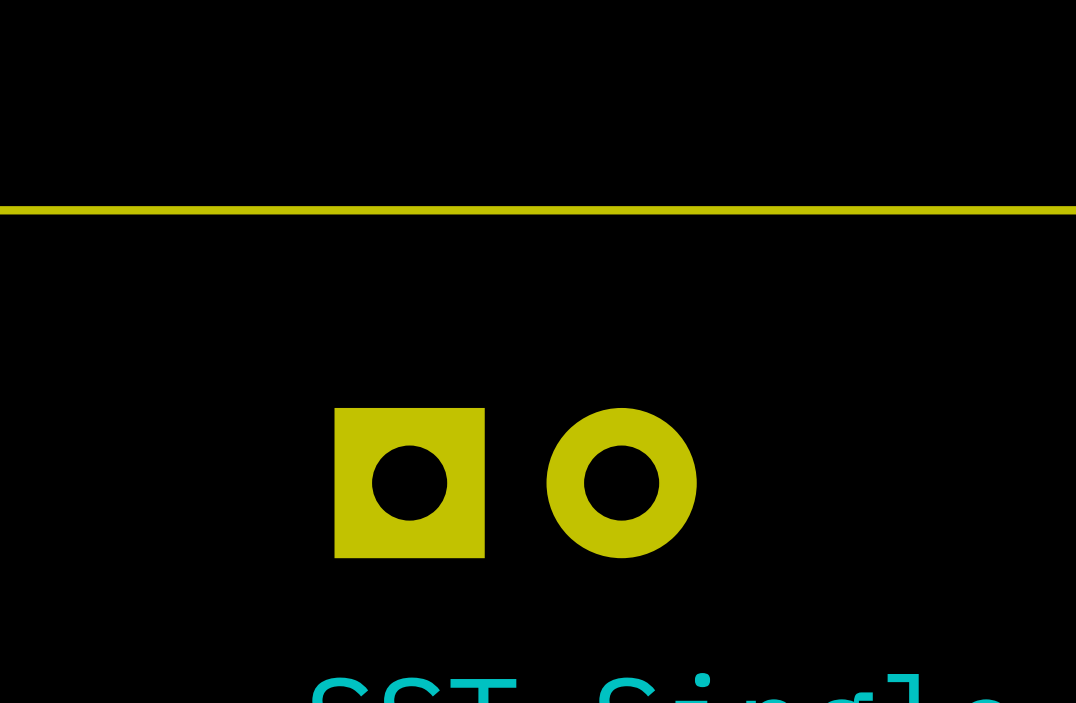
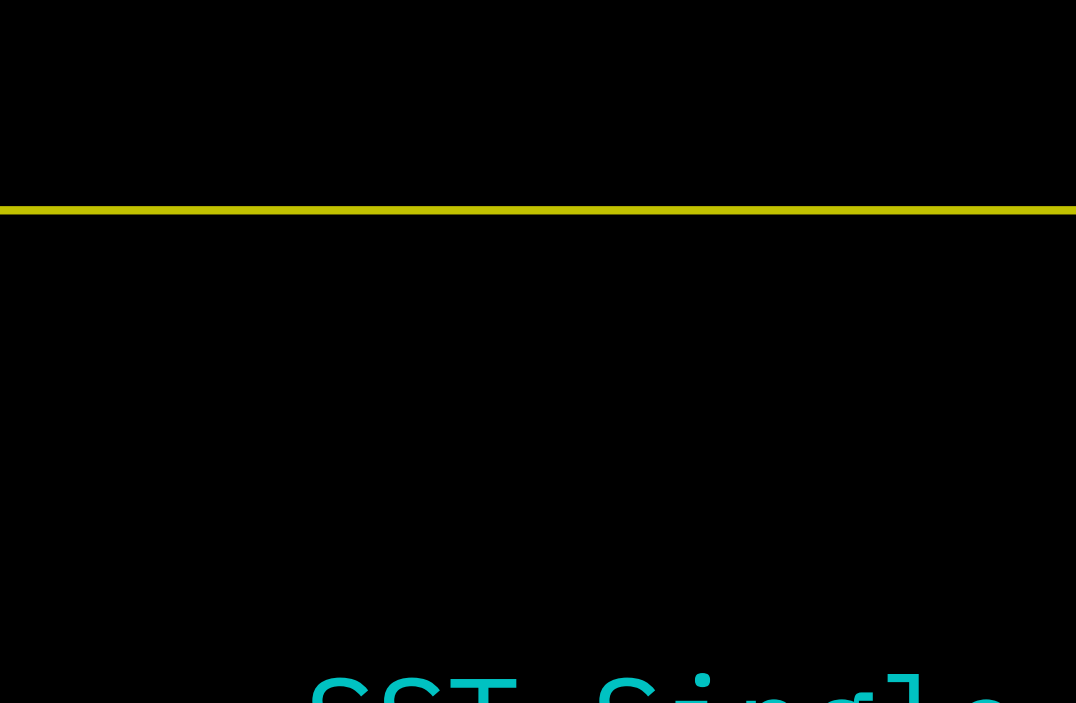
part: (515, 483) -> none

